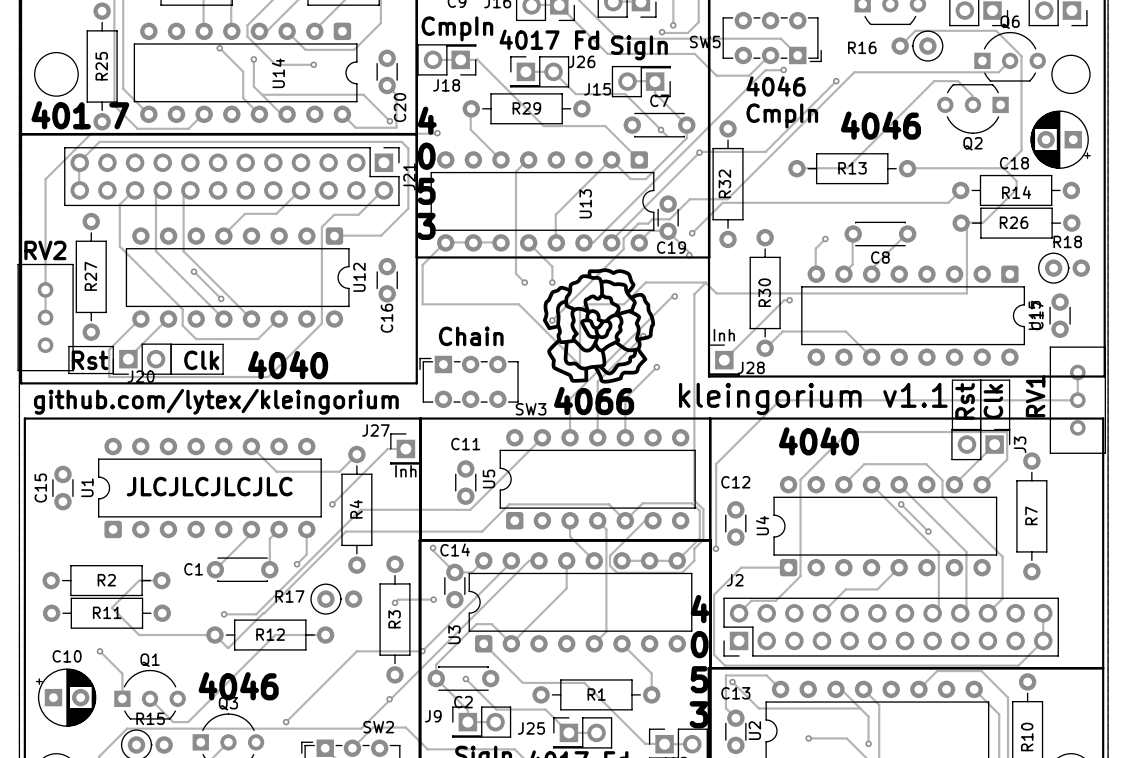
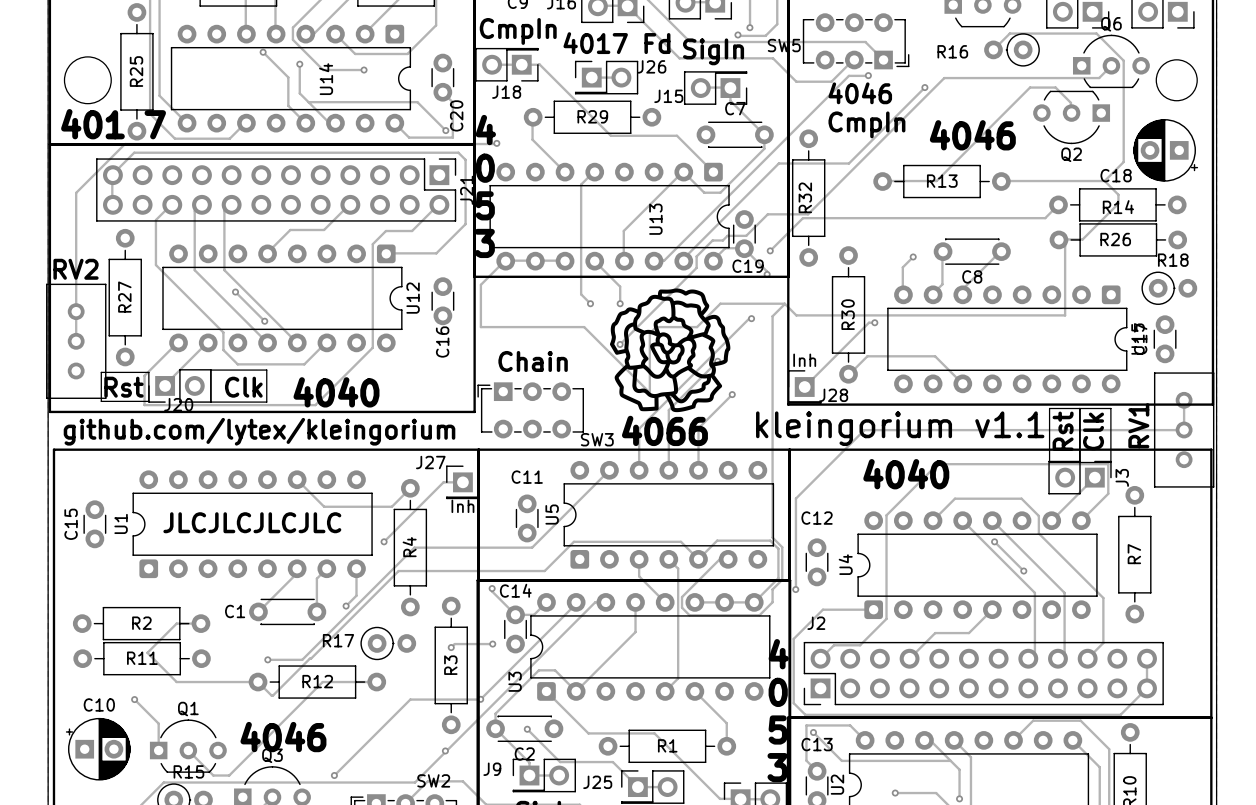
track: (553, 71) (575, 94) (625, 94) (667, 136) -> none
via: (661, 129) -> none
via: (699, 152) -> none

